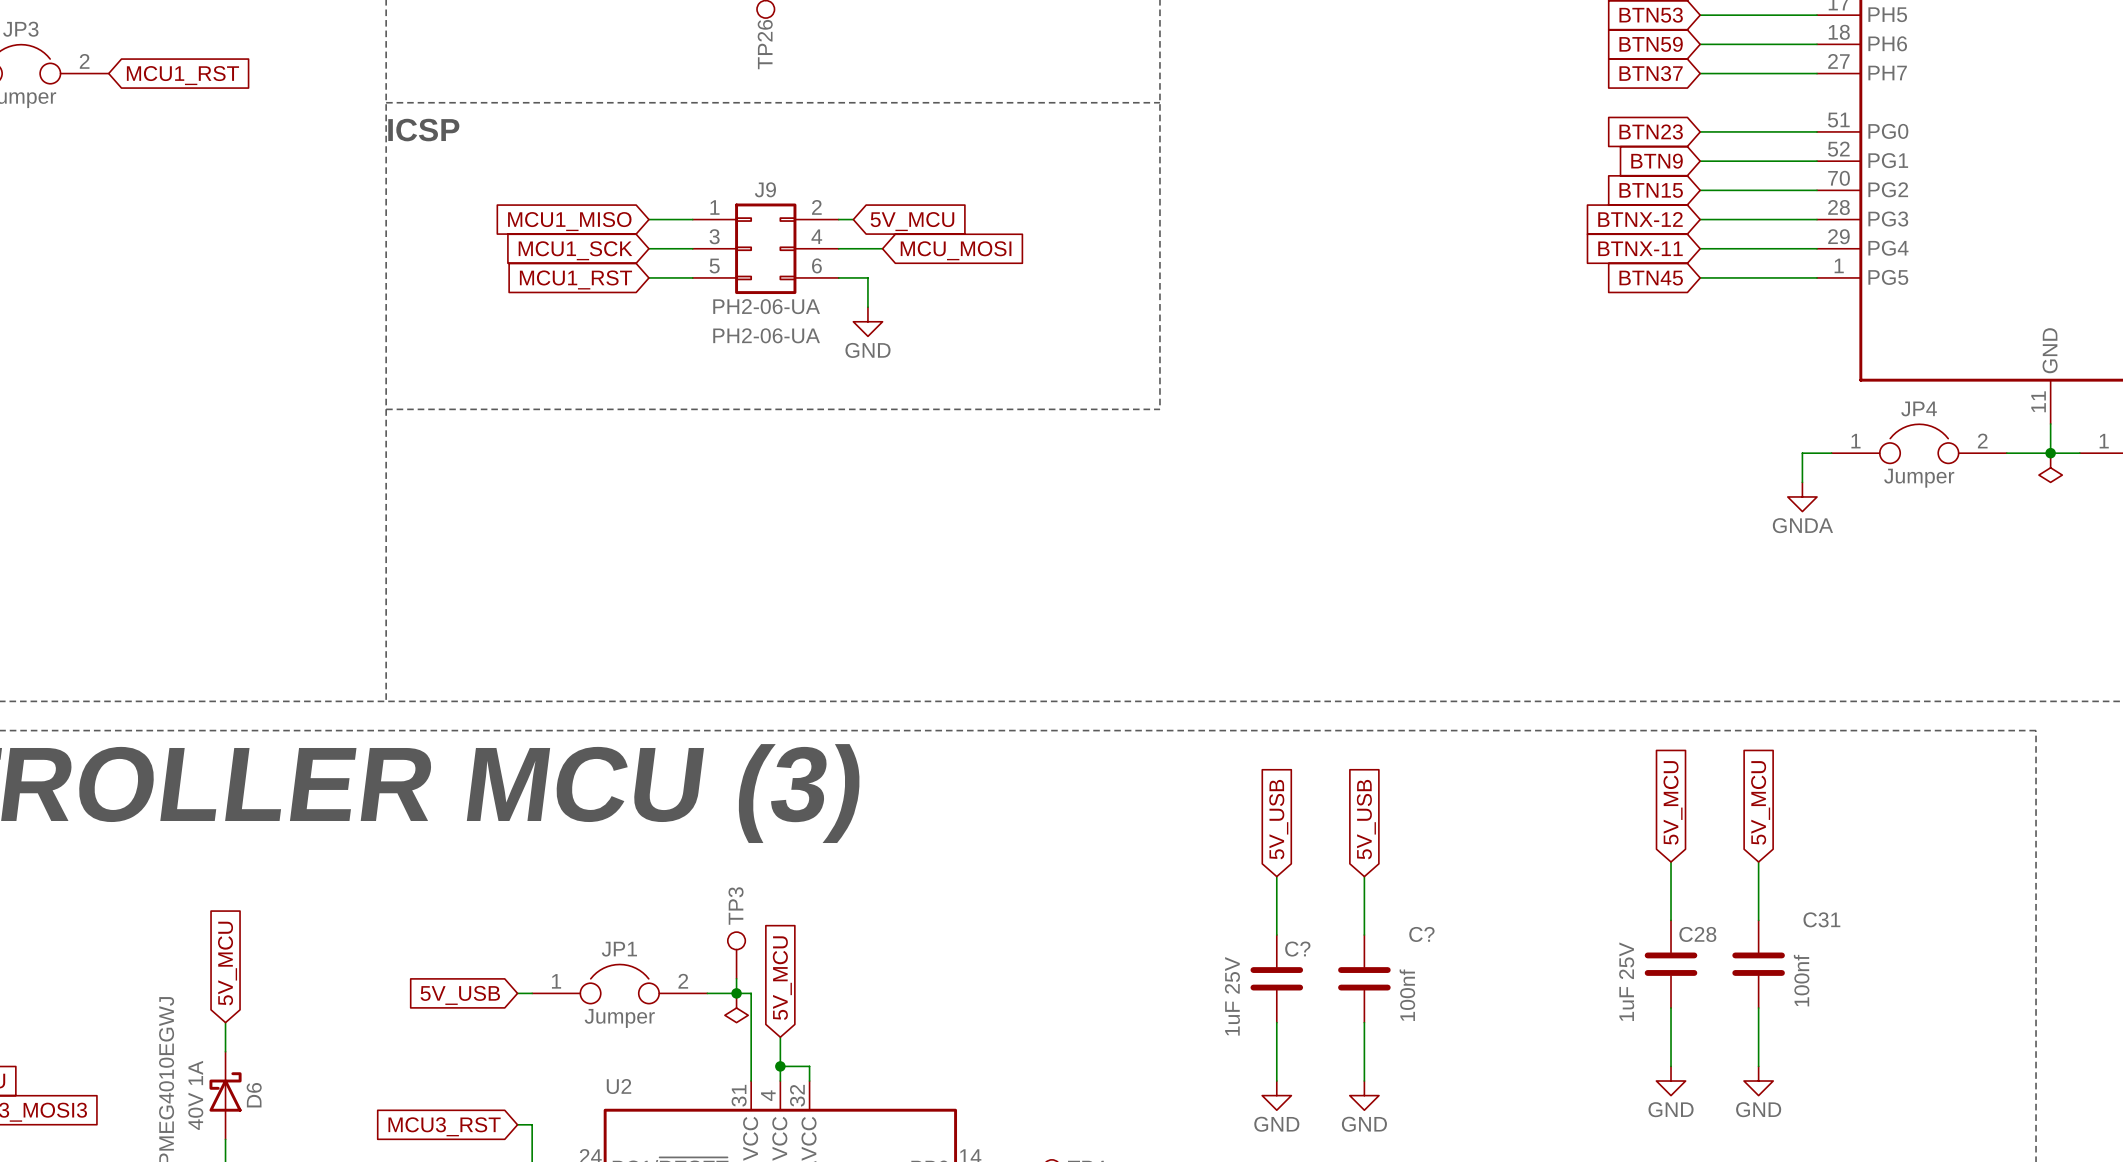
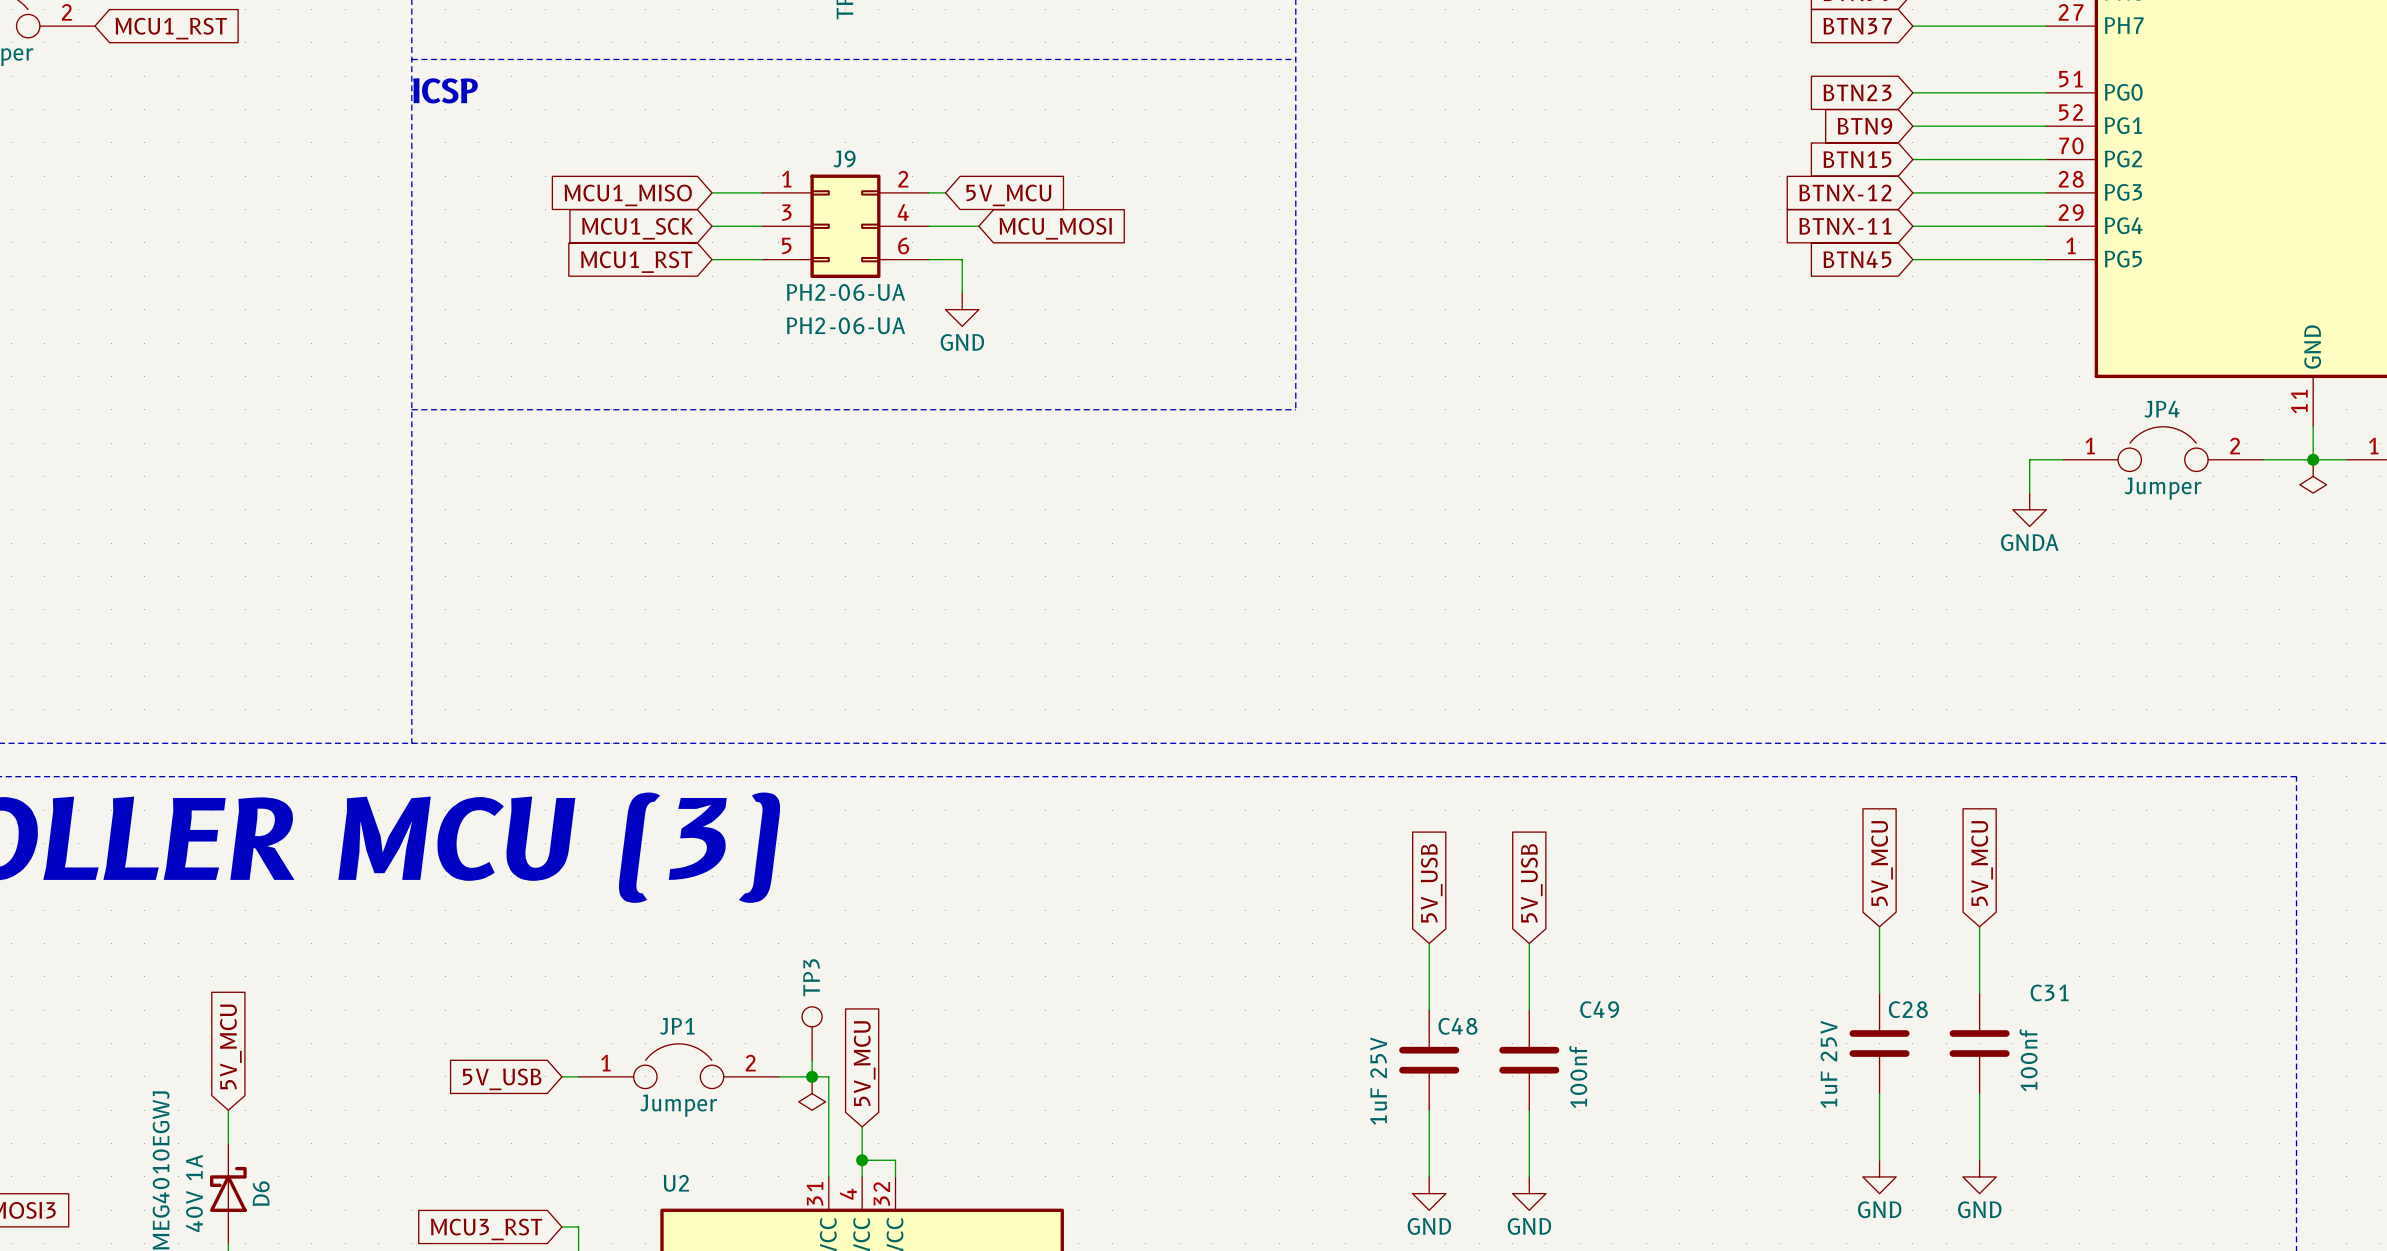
C? name: C? (1421, 934) -> C49 (1599, 1009)
C? name: C? (1297, 949) -> C48 (1457, 1026)

